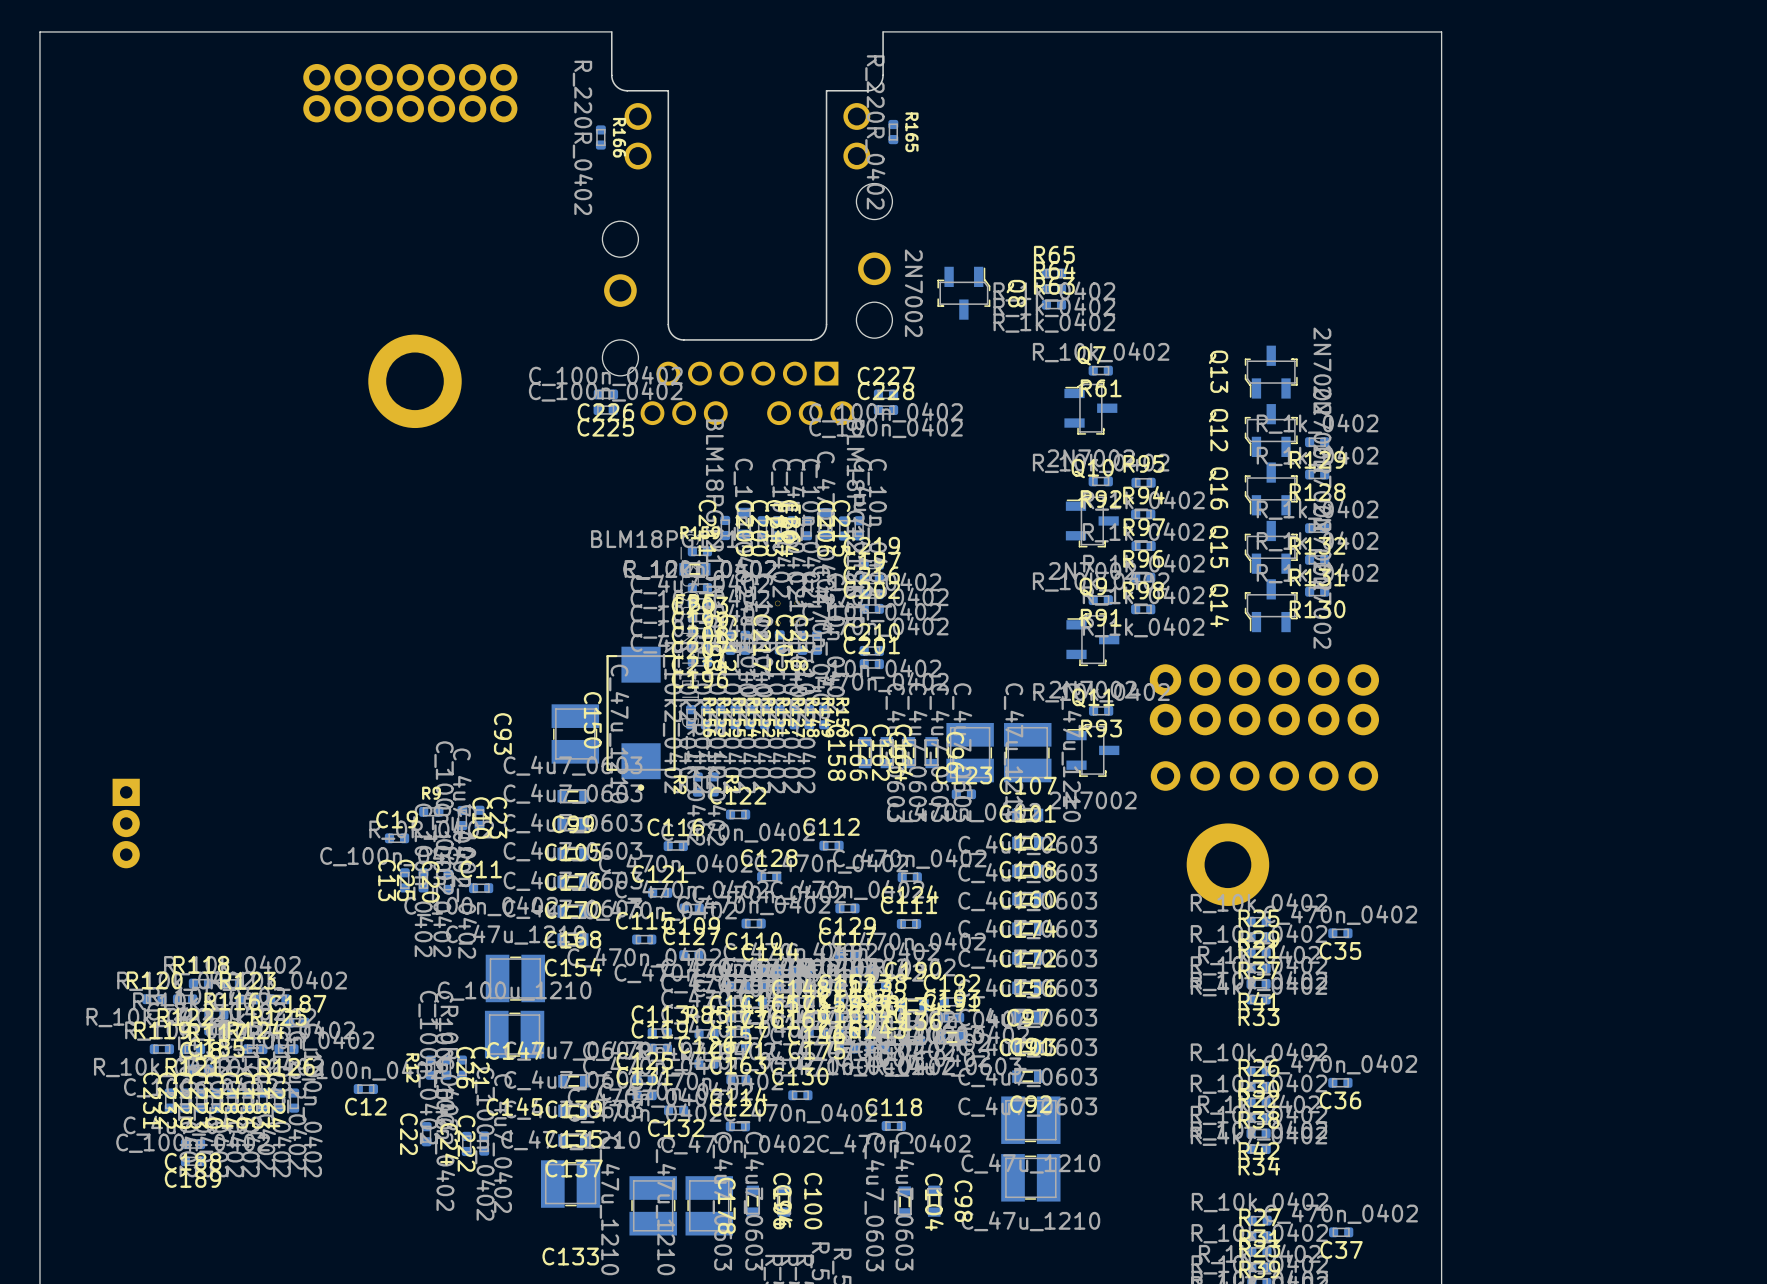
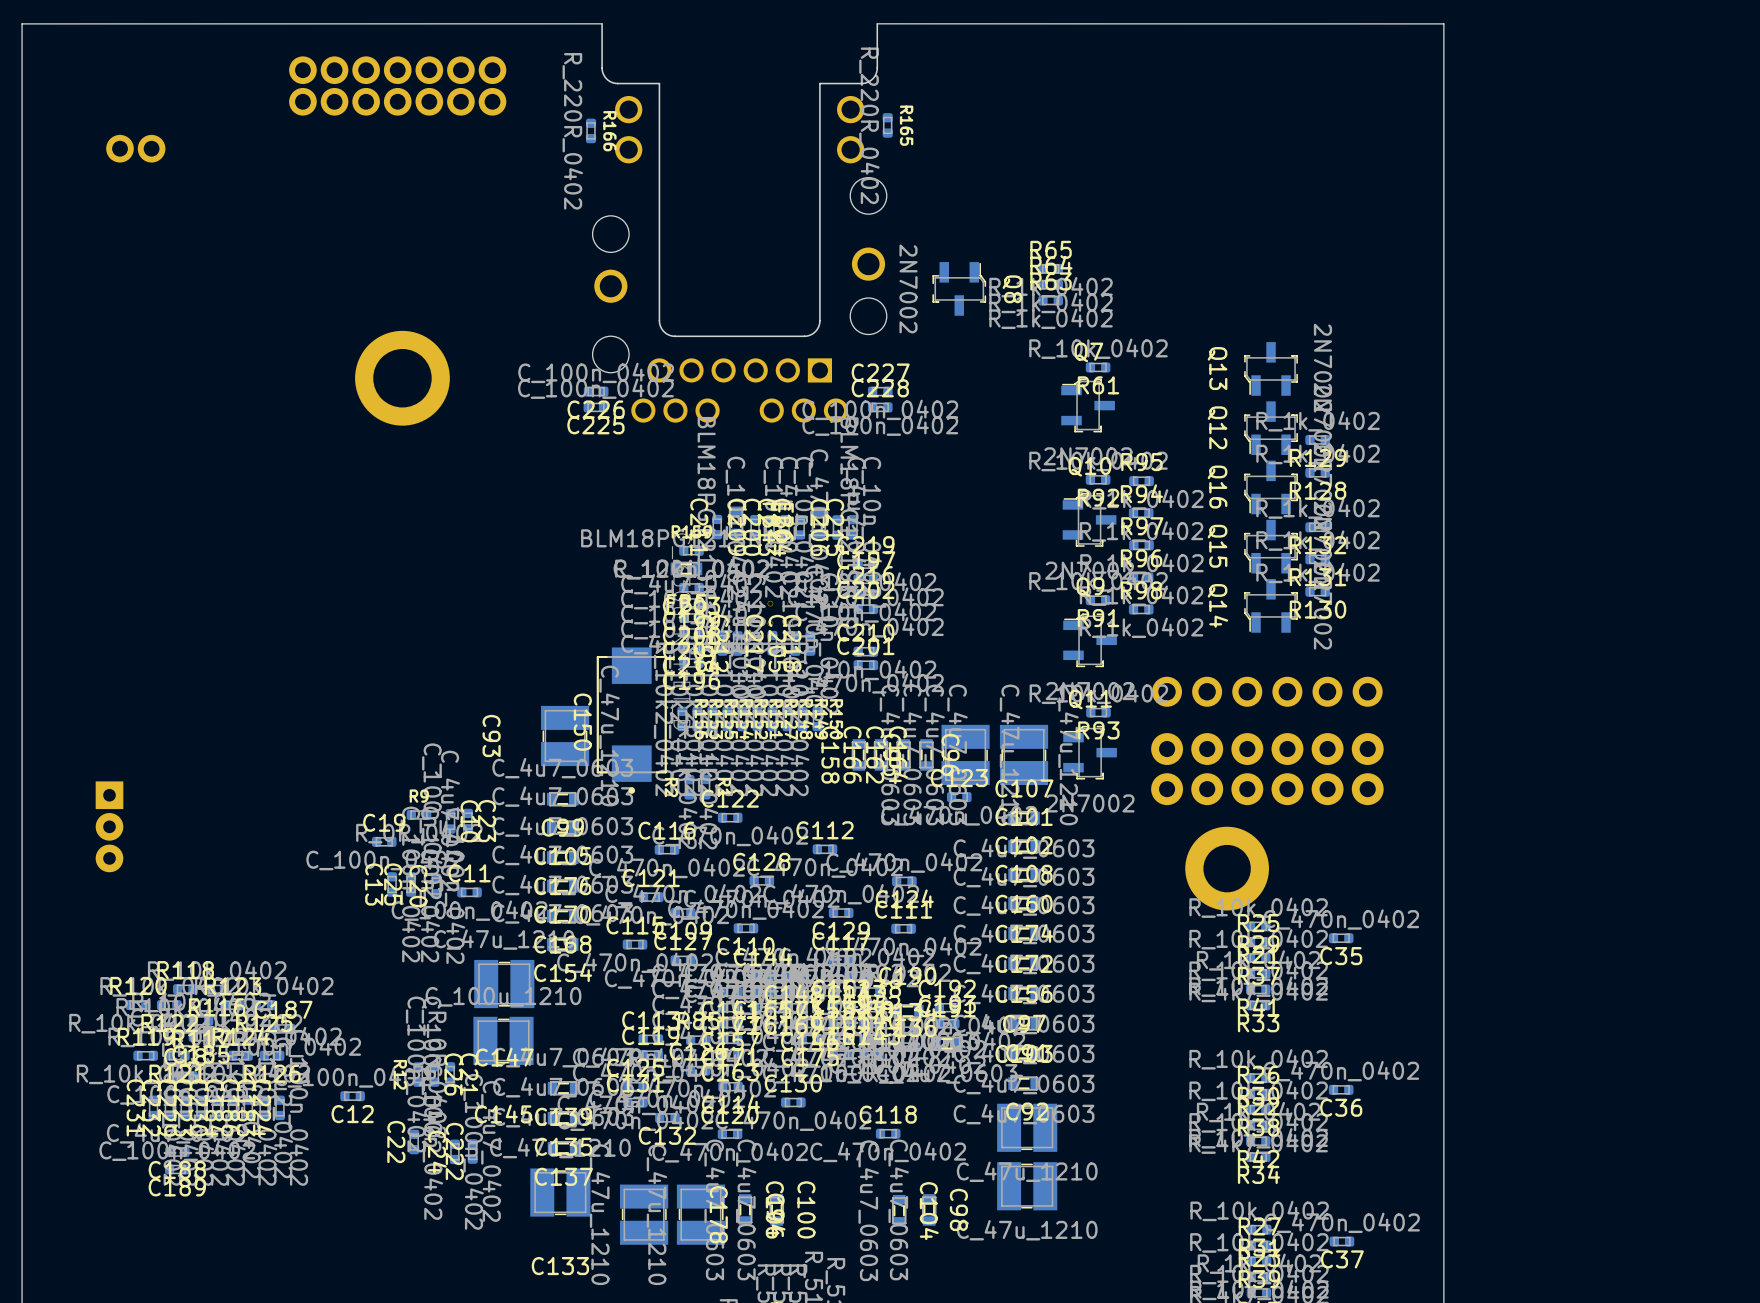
part: none -> (135, 148)
part footprint: [1149, 664, 1380, 736] -> [1152, 676, 1383, 707]
part footprint: [1150, 761, 1379, 791] -> [1151, 733, 1384, 806]

